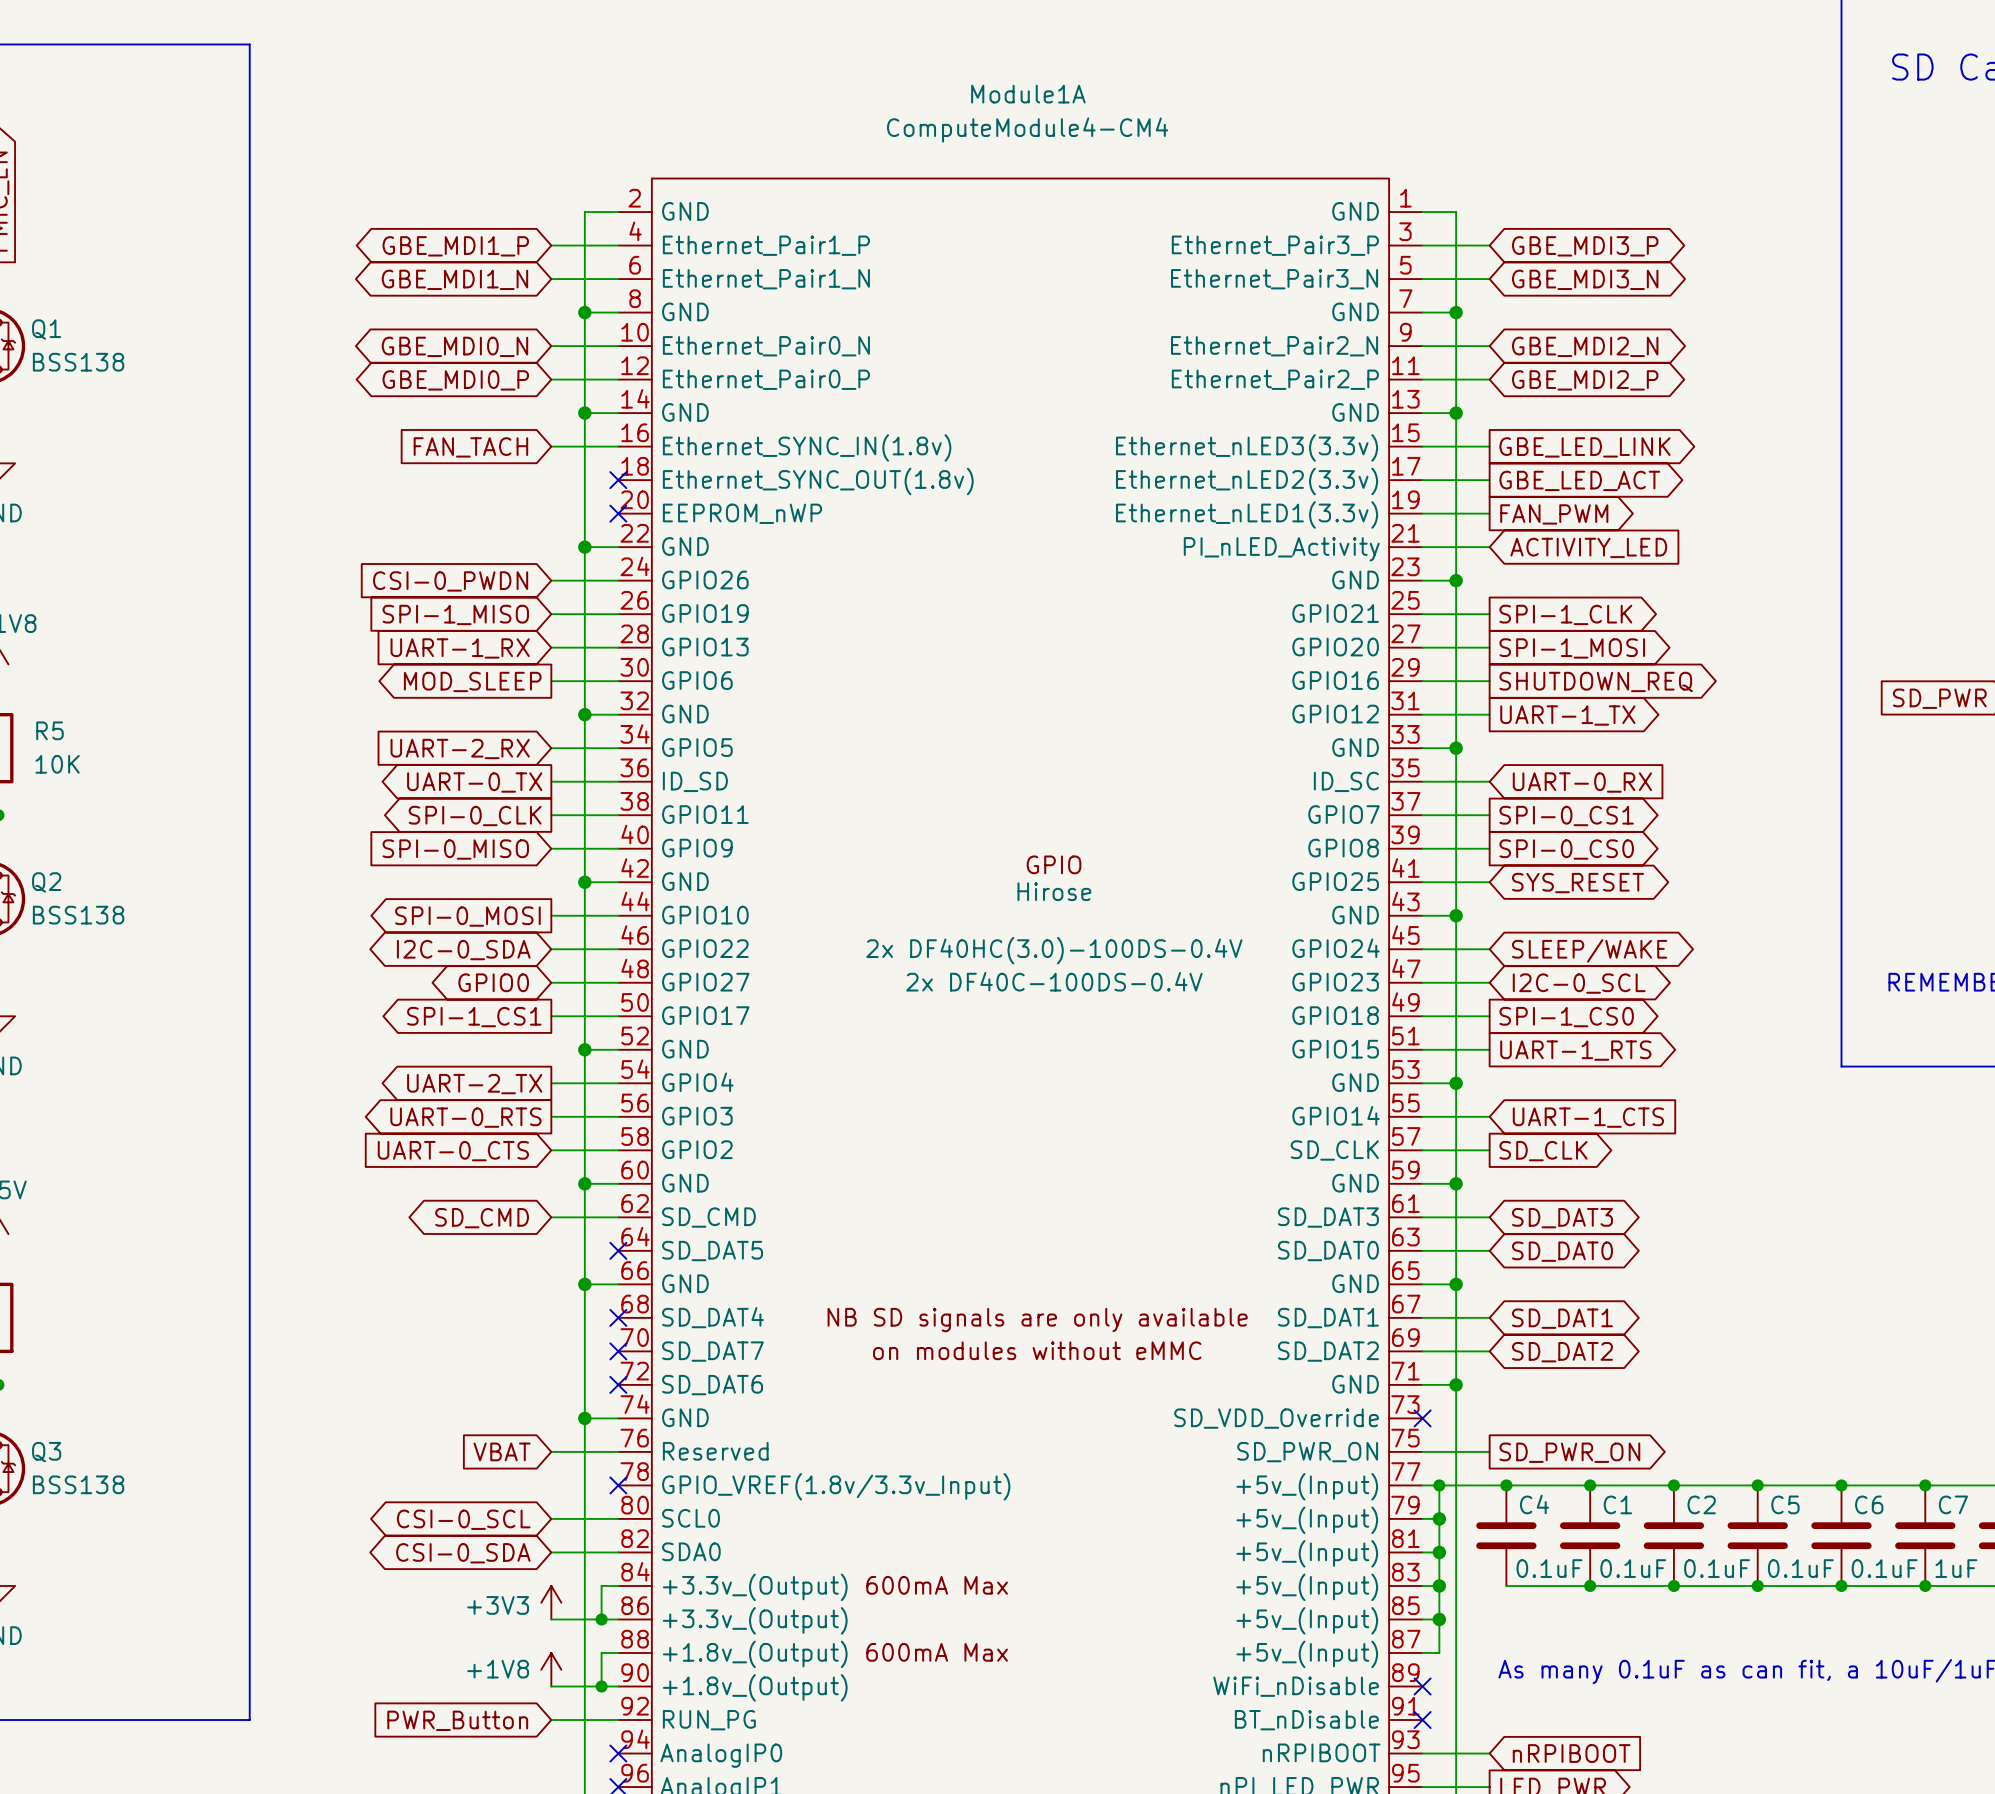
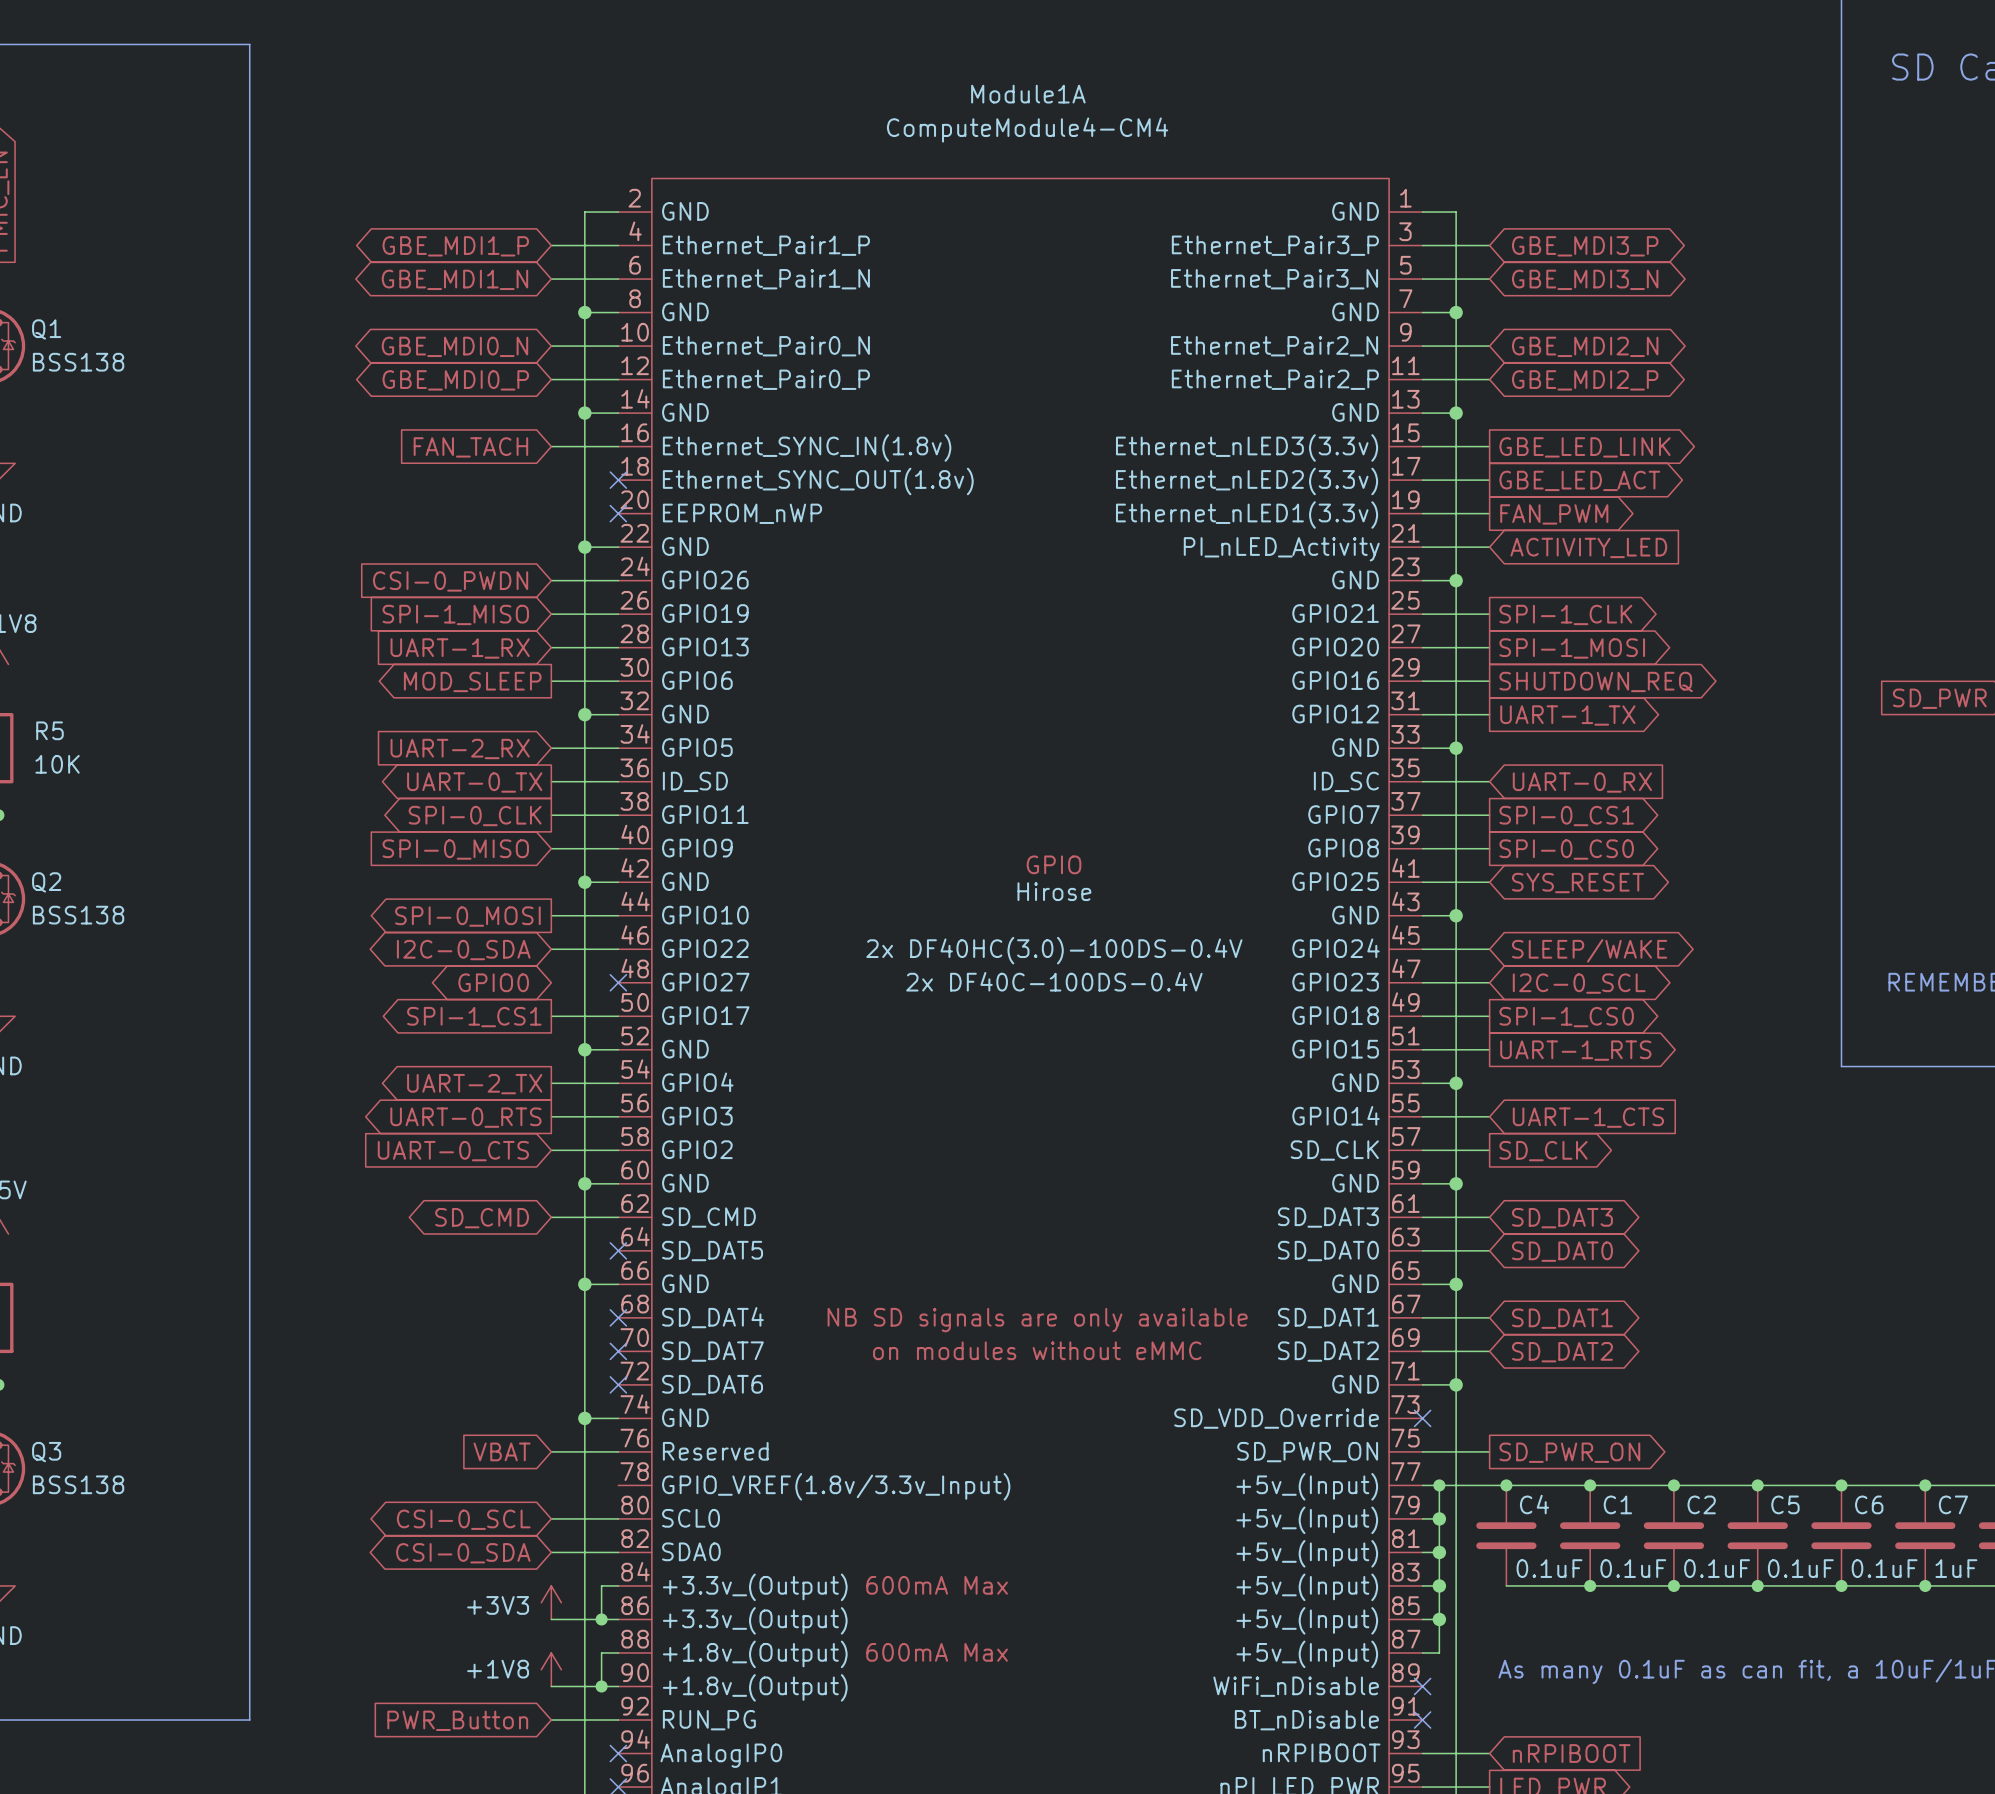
wire: (551, 982) (618, 982) -> none
no-connect mark: none -> (618, 982)
no-connect mark: (618, 1485) -> none

